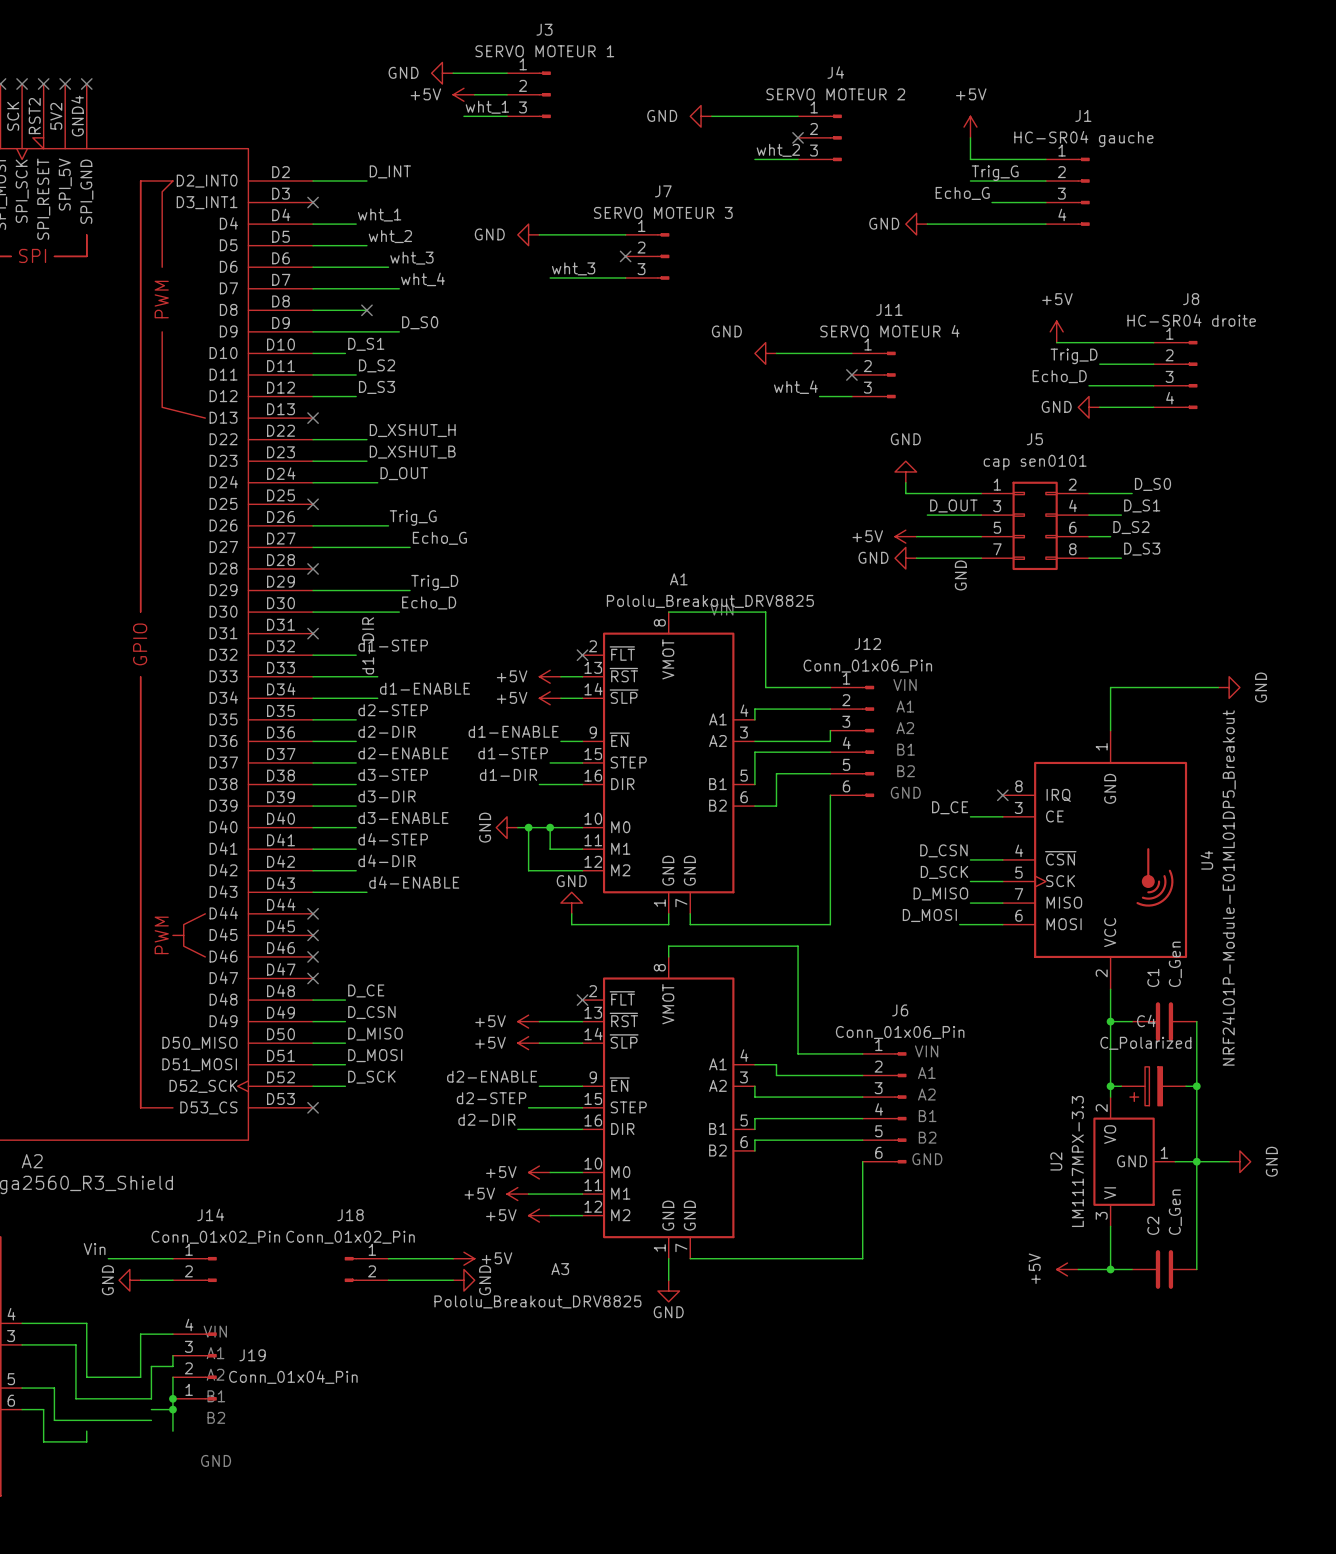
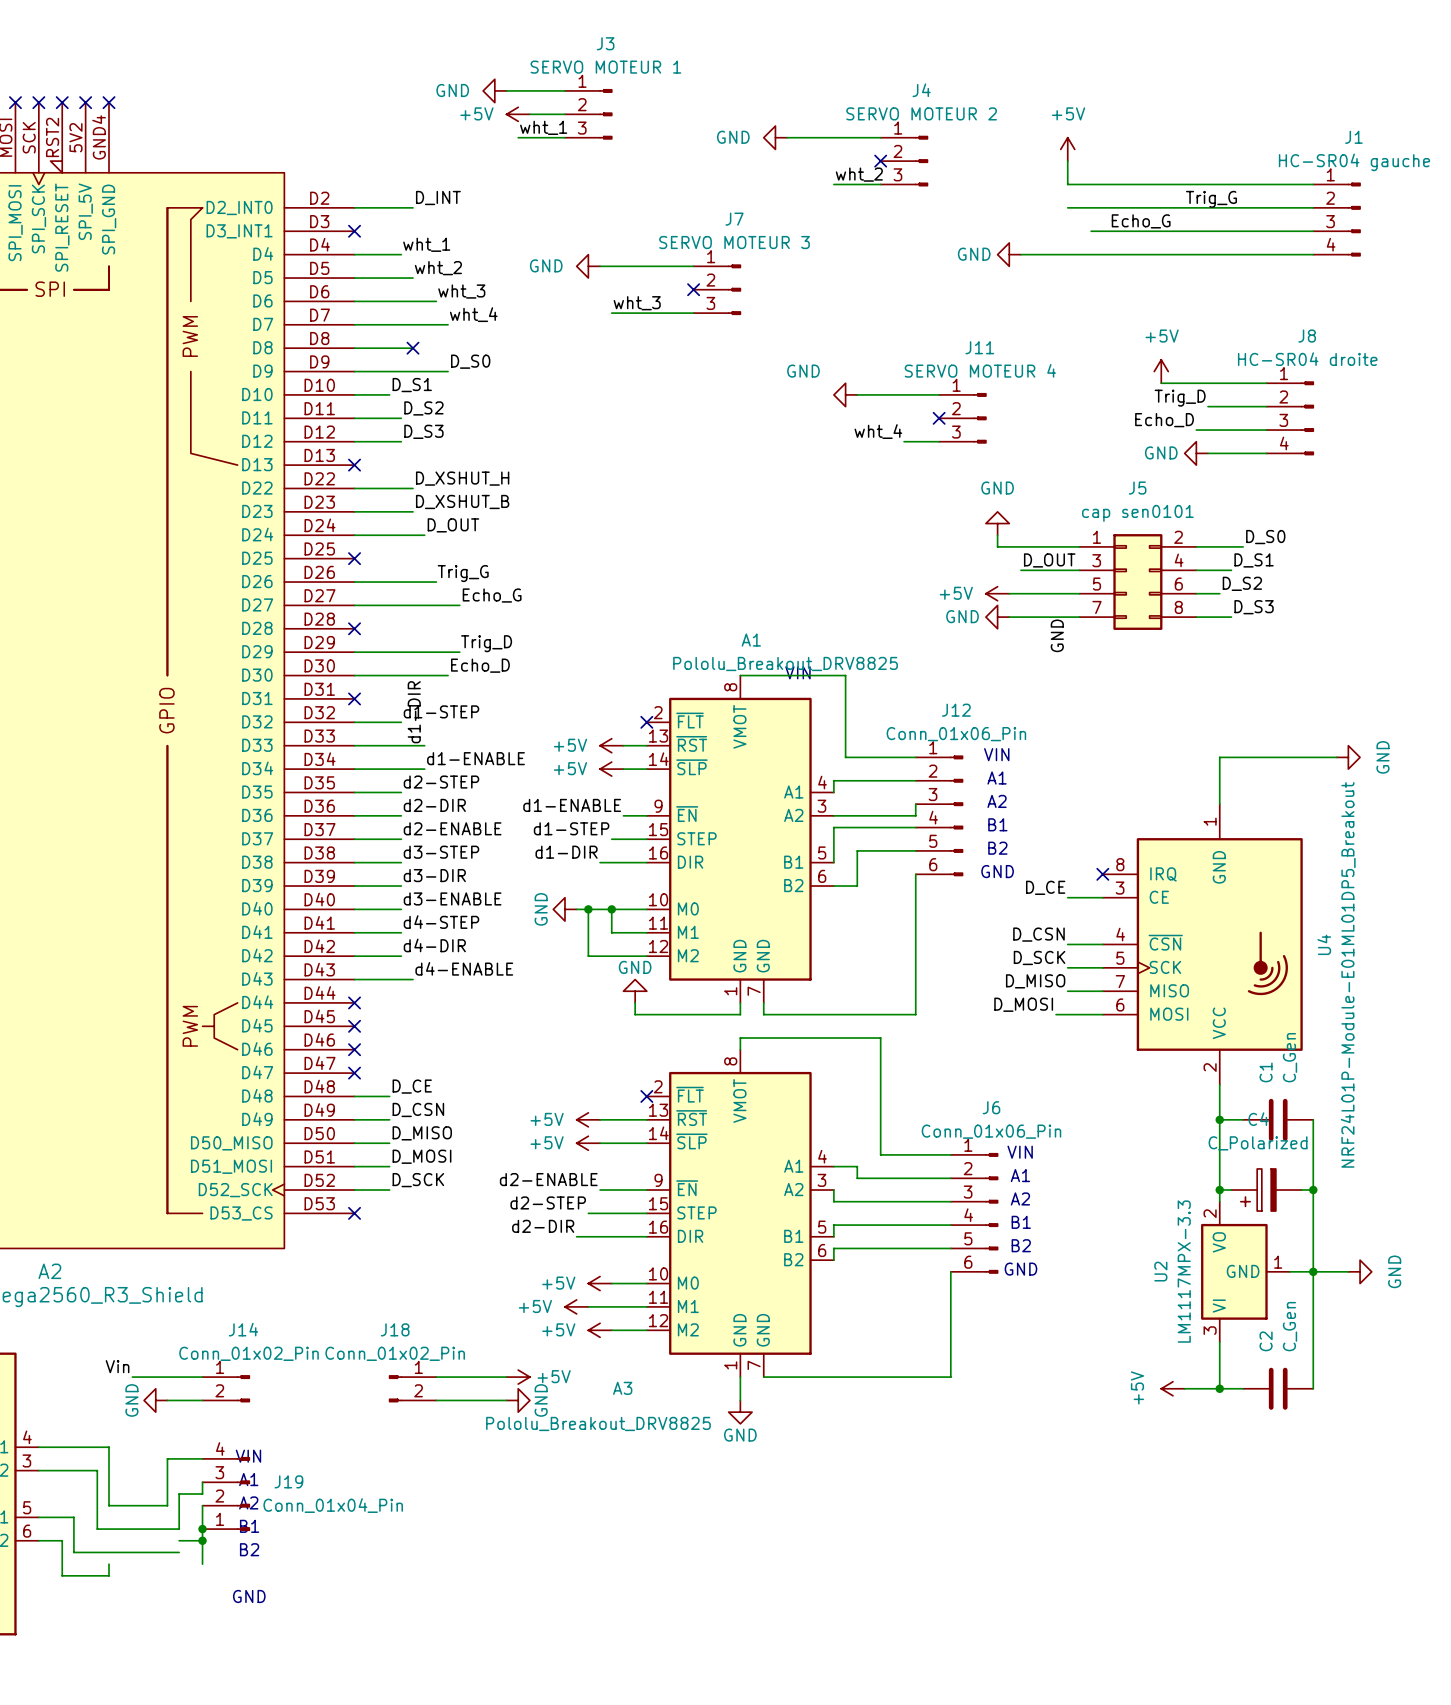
wire: none -> (1149, 184) (1313, 184)
label position: Trig_G (995, 173) -> Trig_G (1211, 199)
wire: none -> (1149, 207) (1313, 207)
J1 position: (1067, 191) -> (1337, 219)
label position: Echo_G (962, 193) -> Echo_G (1141, 221)
wire: none -> (1149, 231) (1313, 231)
wire: none -> (1149, 254) (1313, 254)

